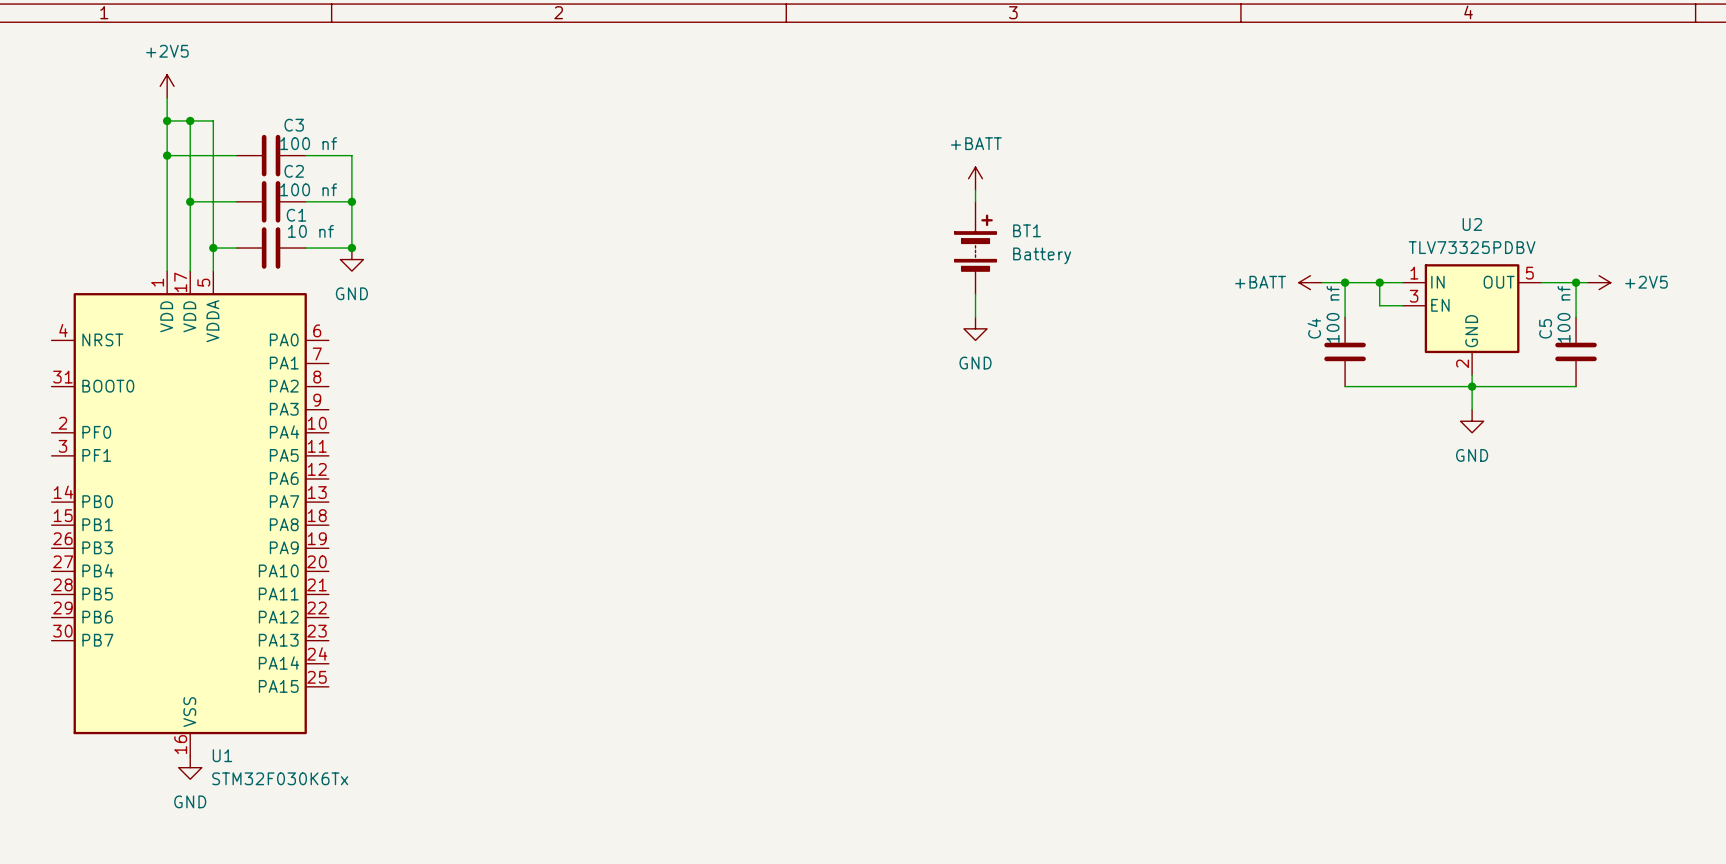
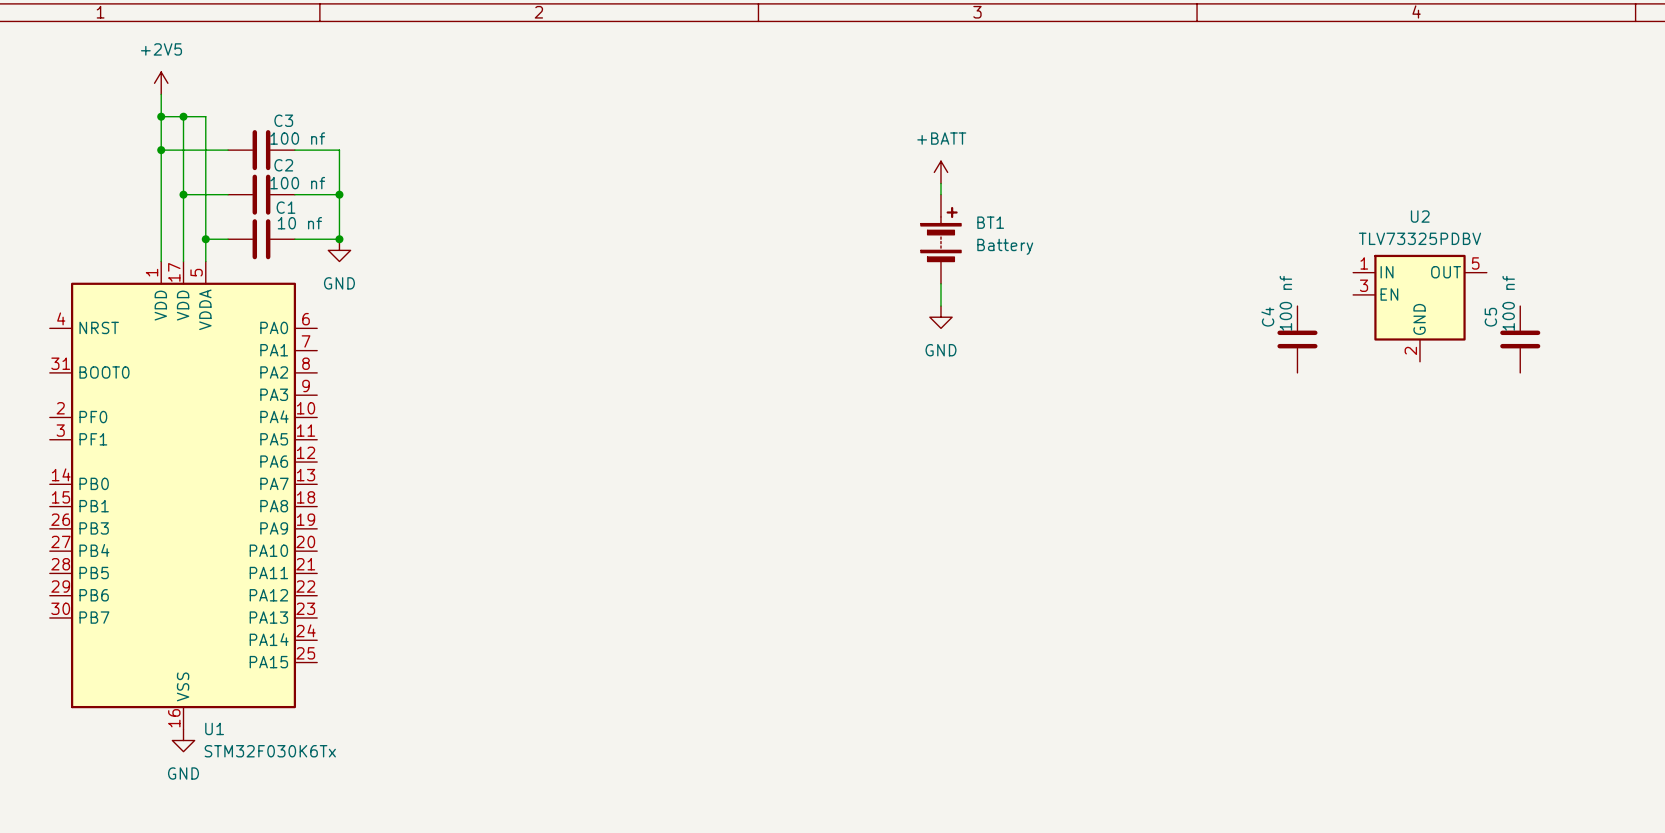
power symbol: +BATT (1310, 282) -> none
wire: (1321, 282) (1402, 282) -> none
wire: (1345, 282) (1345, 317) -> none
junction: (1345, 282) -> none
wire: (1379, 282) (1379, 305) (1402, 305) -> none
junction: (1379, 282) -> none
wire: (1541, 282) (1587, 282) -> none
wire: (1576, 282) (1576, 317) -> none
junction: (1576, 282) -> none
power symbol: +2V5 (1599, 282) -> none
wire: (1472, 375) (1472, 409) -> none
wire: (1345, 386) (1576, 386) -> none
junction: (1472, 386) -> none
power symbol: GND (1472, 421) -> none

